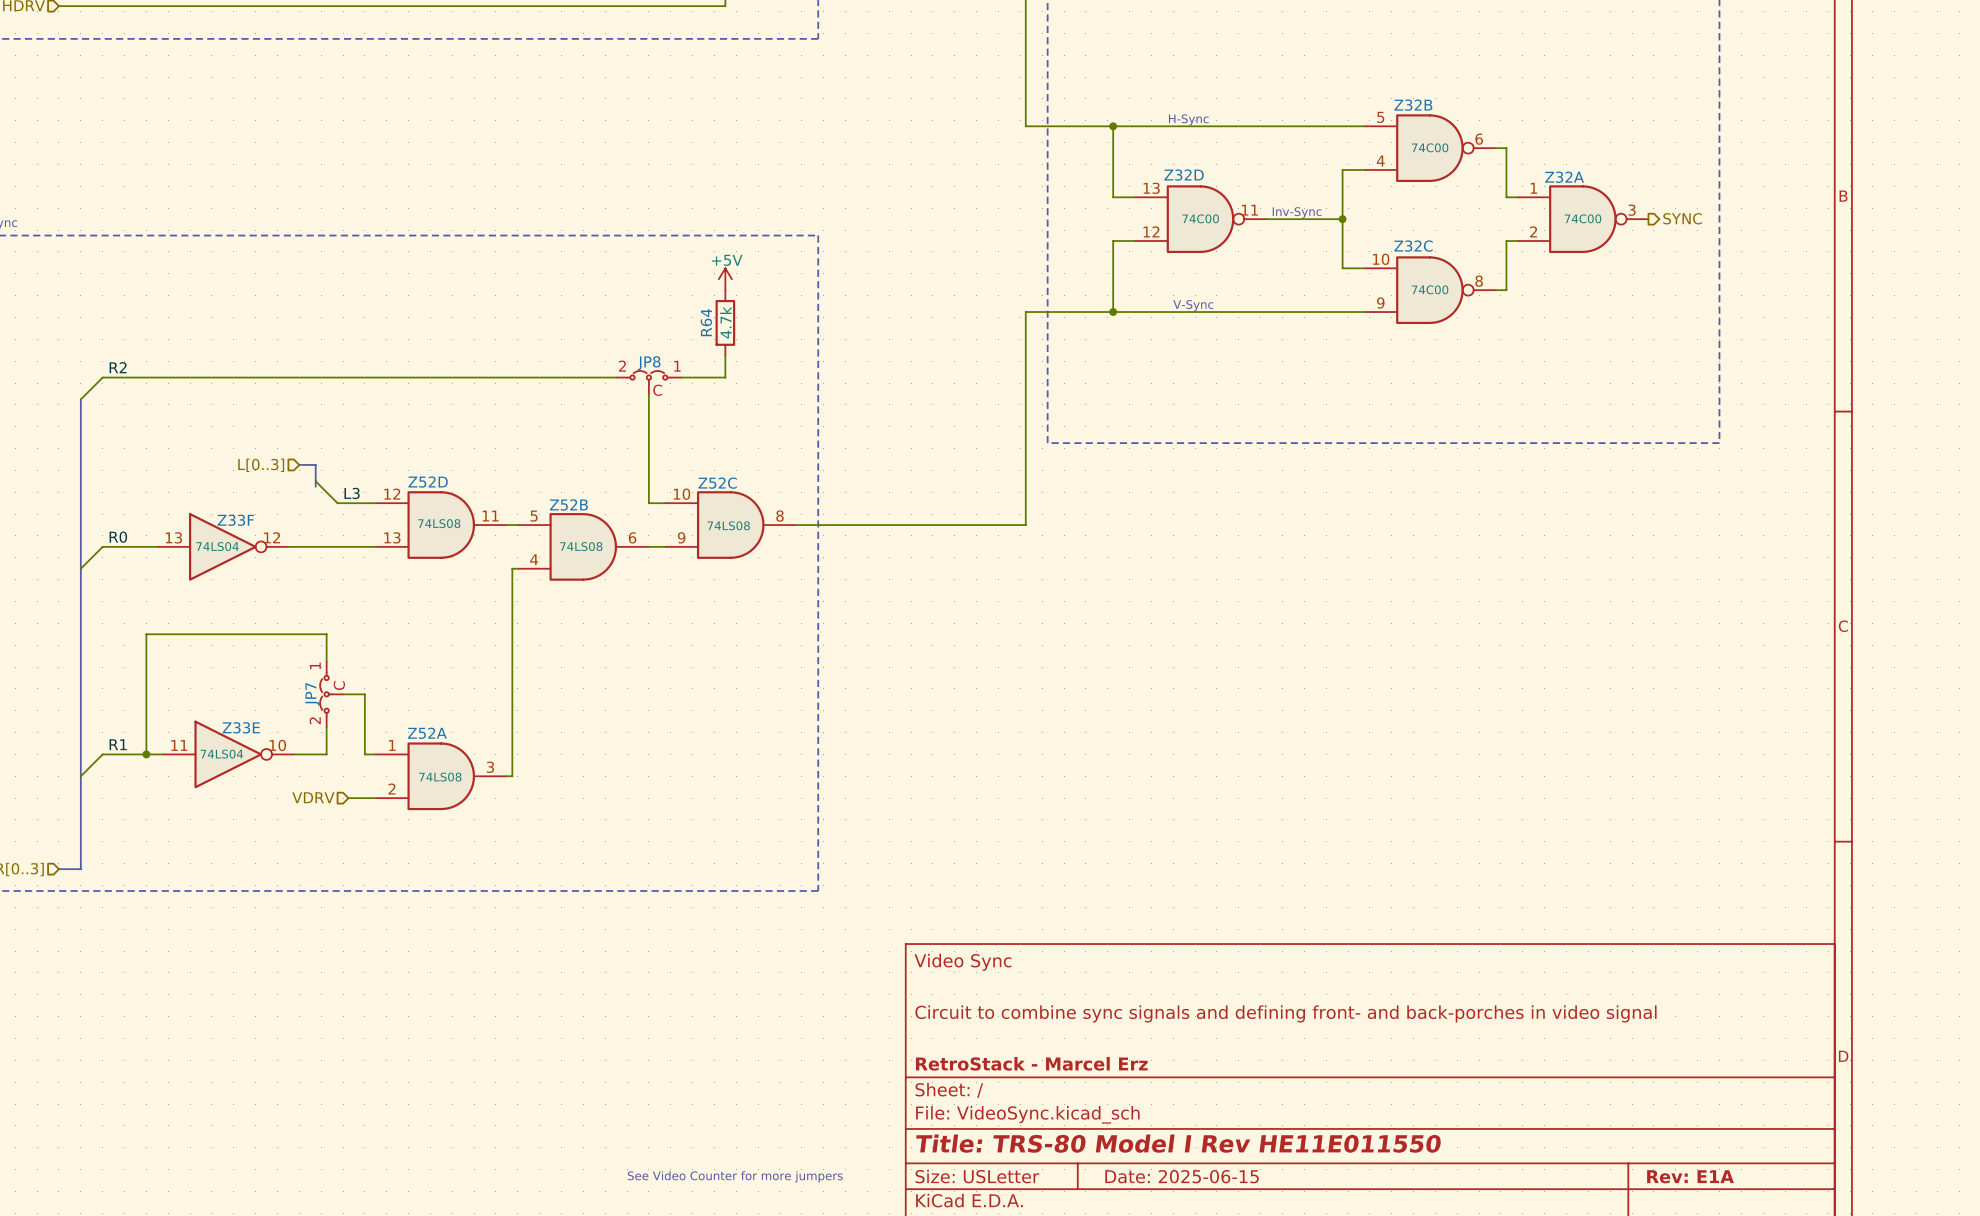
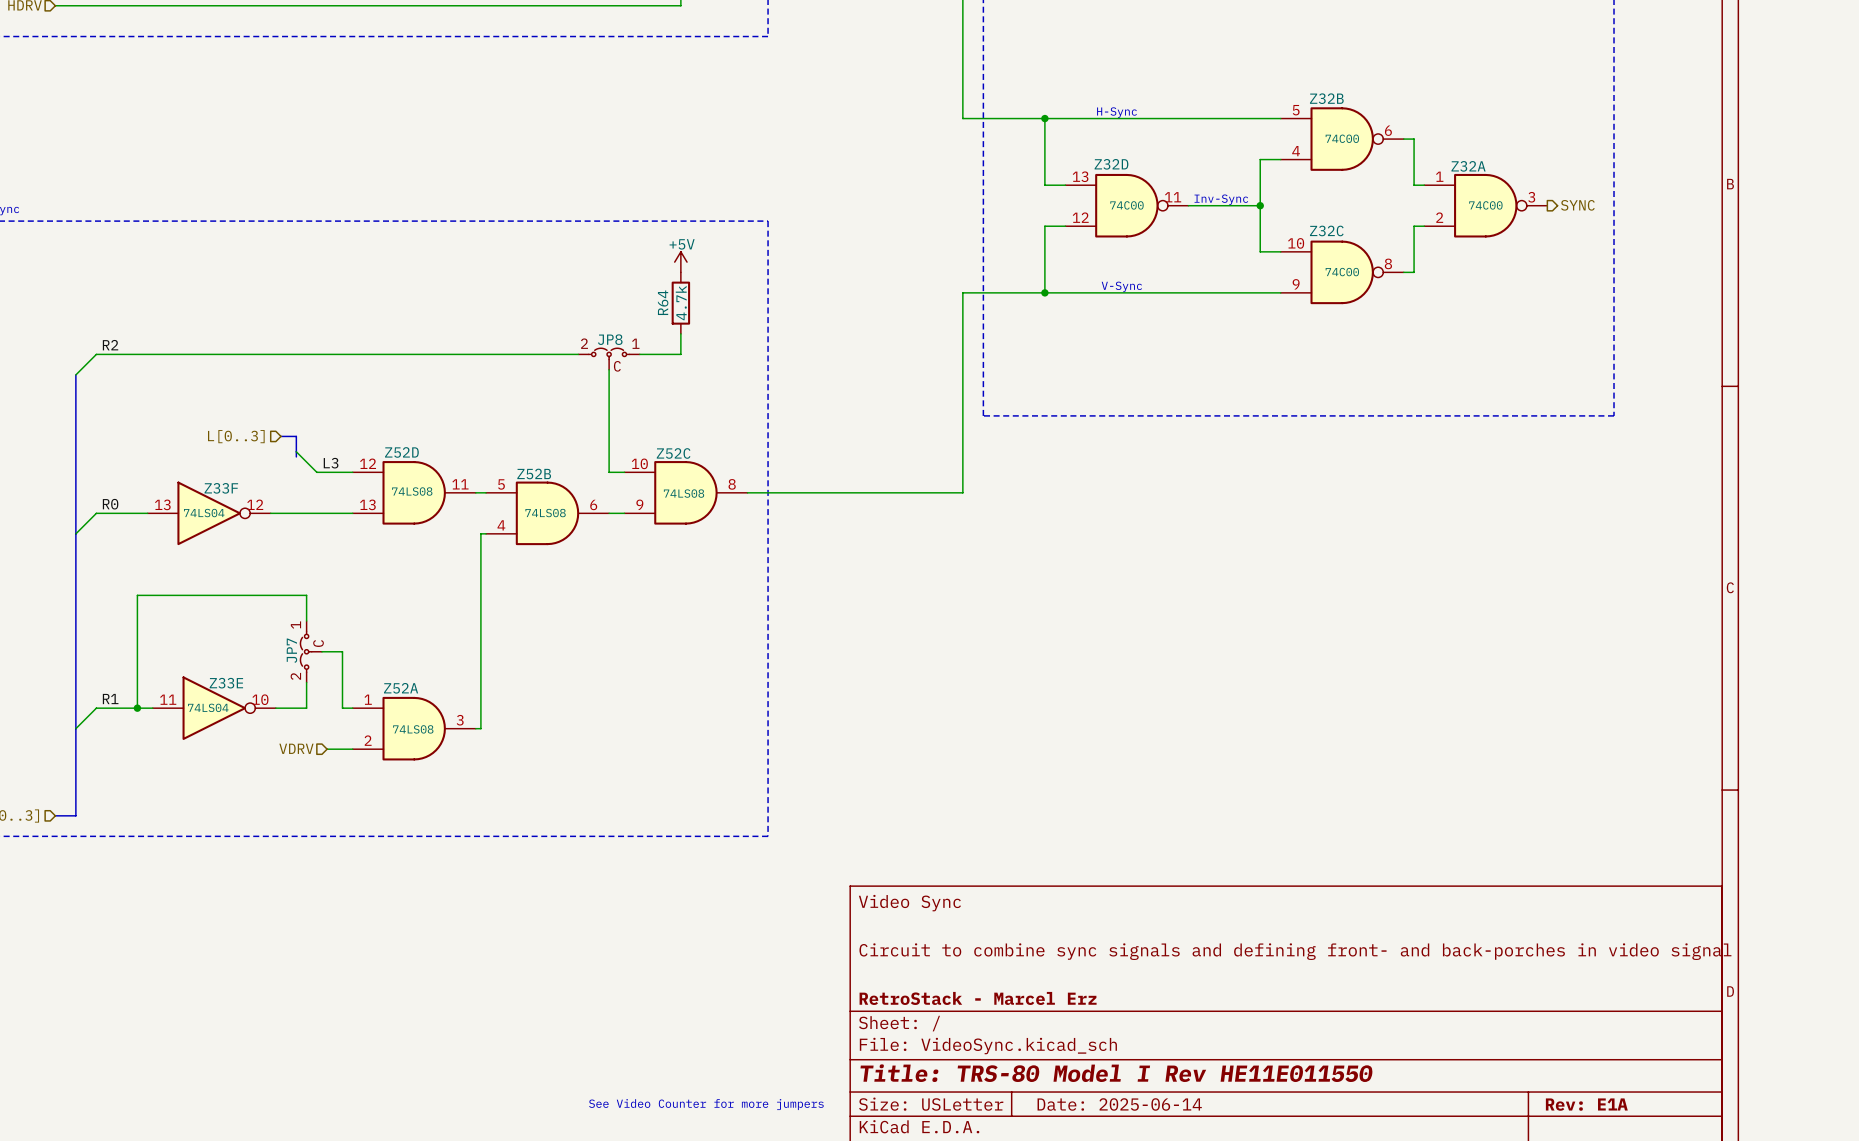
title block: Date: 2025-06-15 (1182, 1176) -> Date: 2025-06-14 (1119, 1104)

